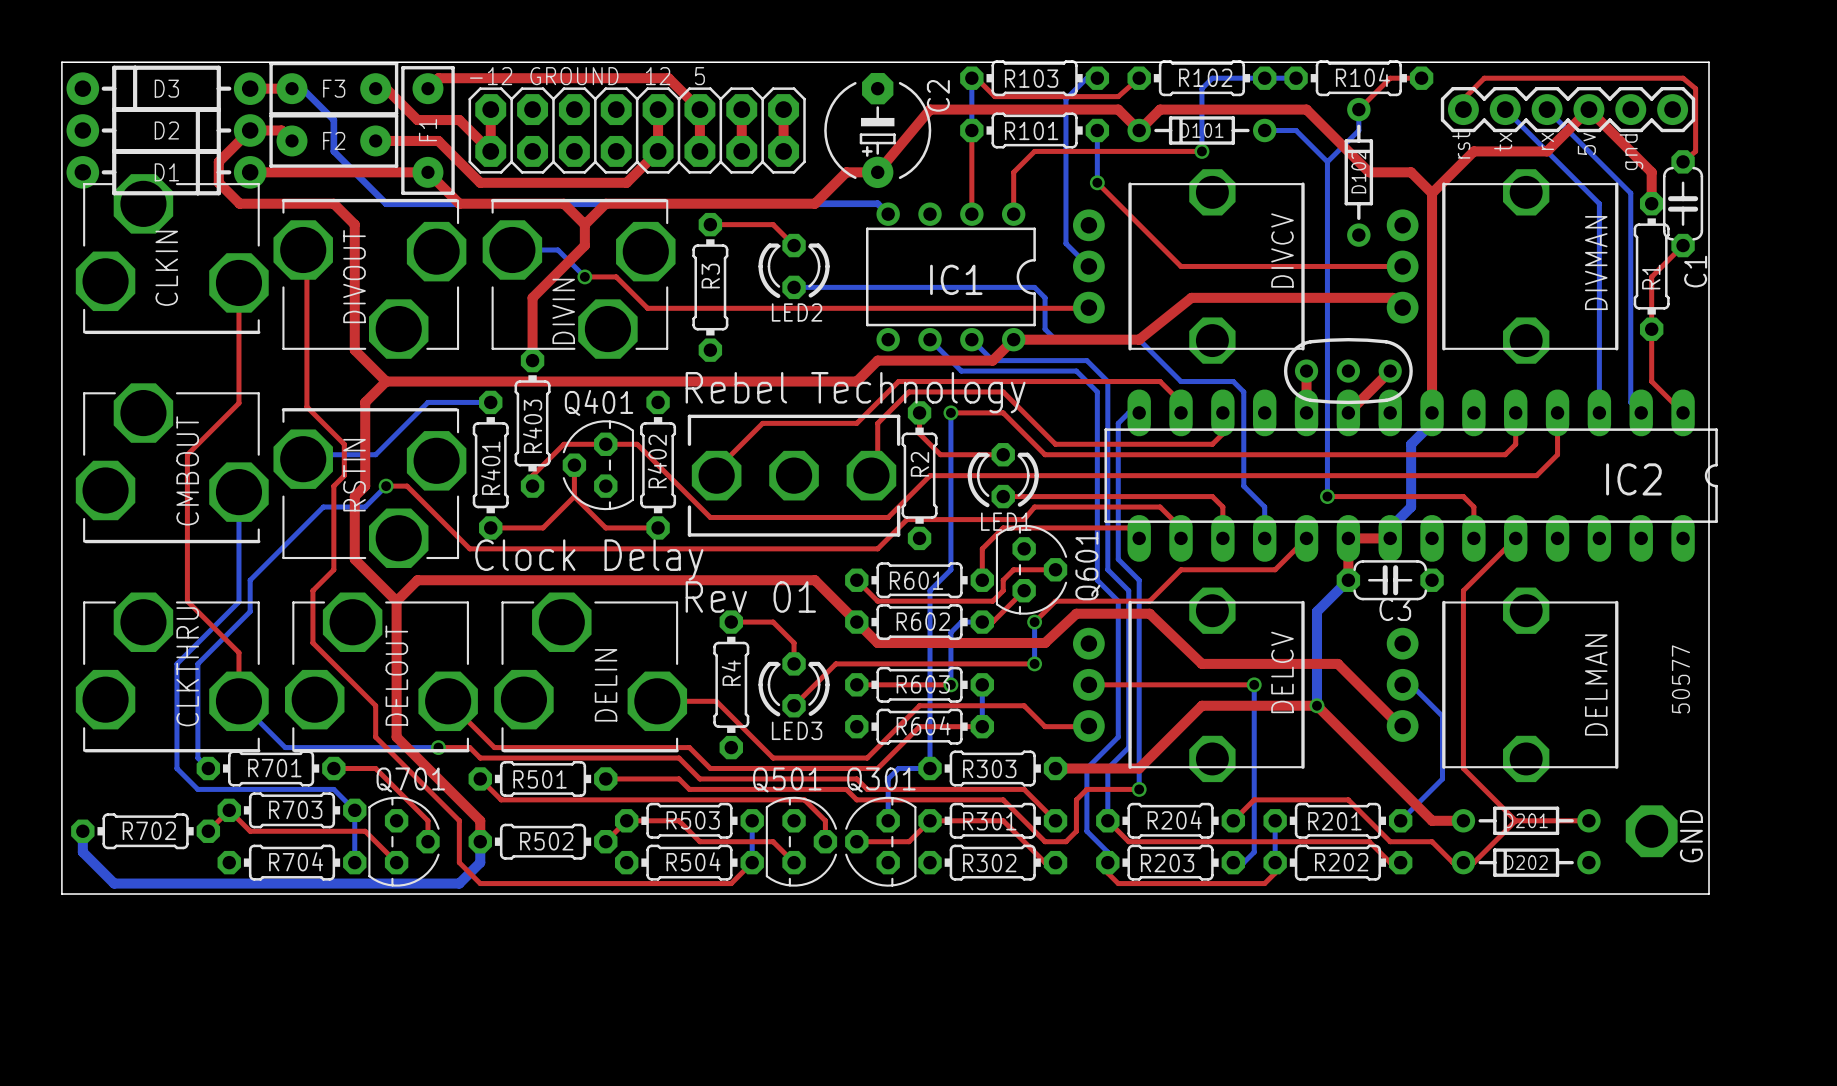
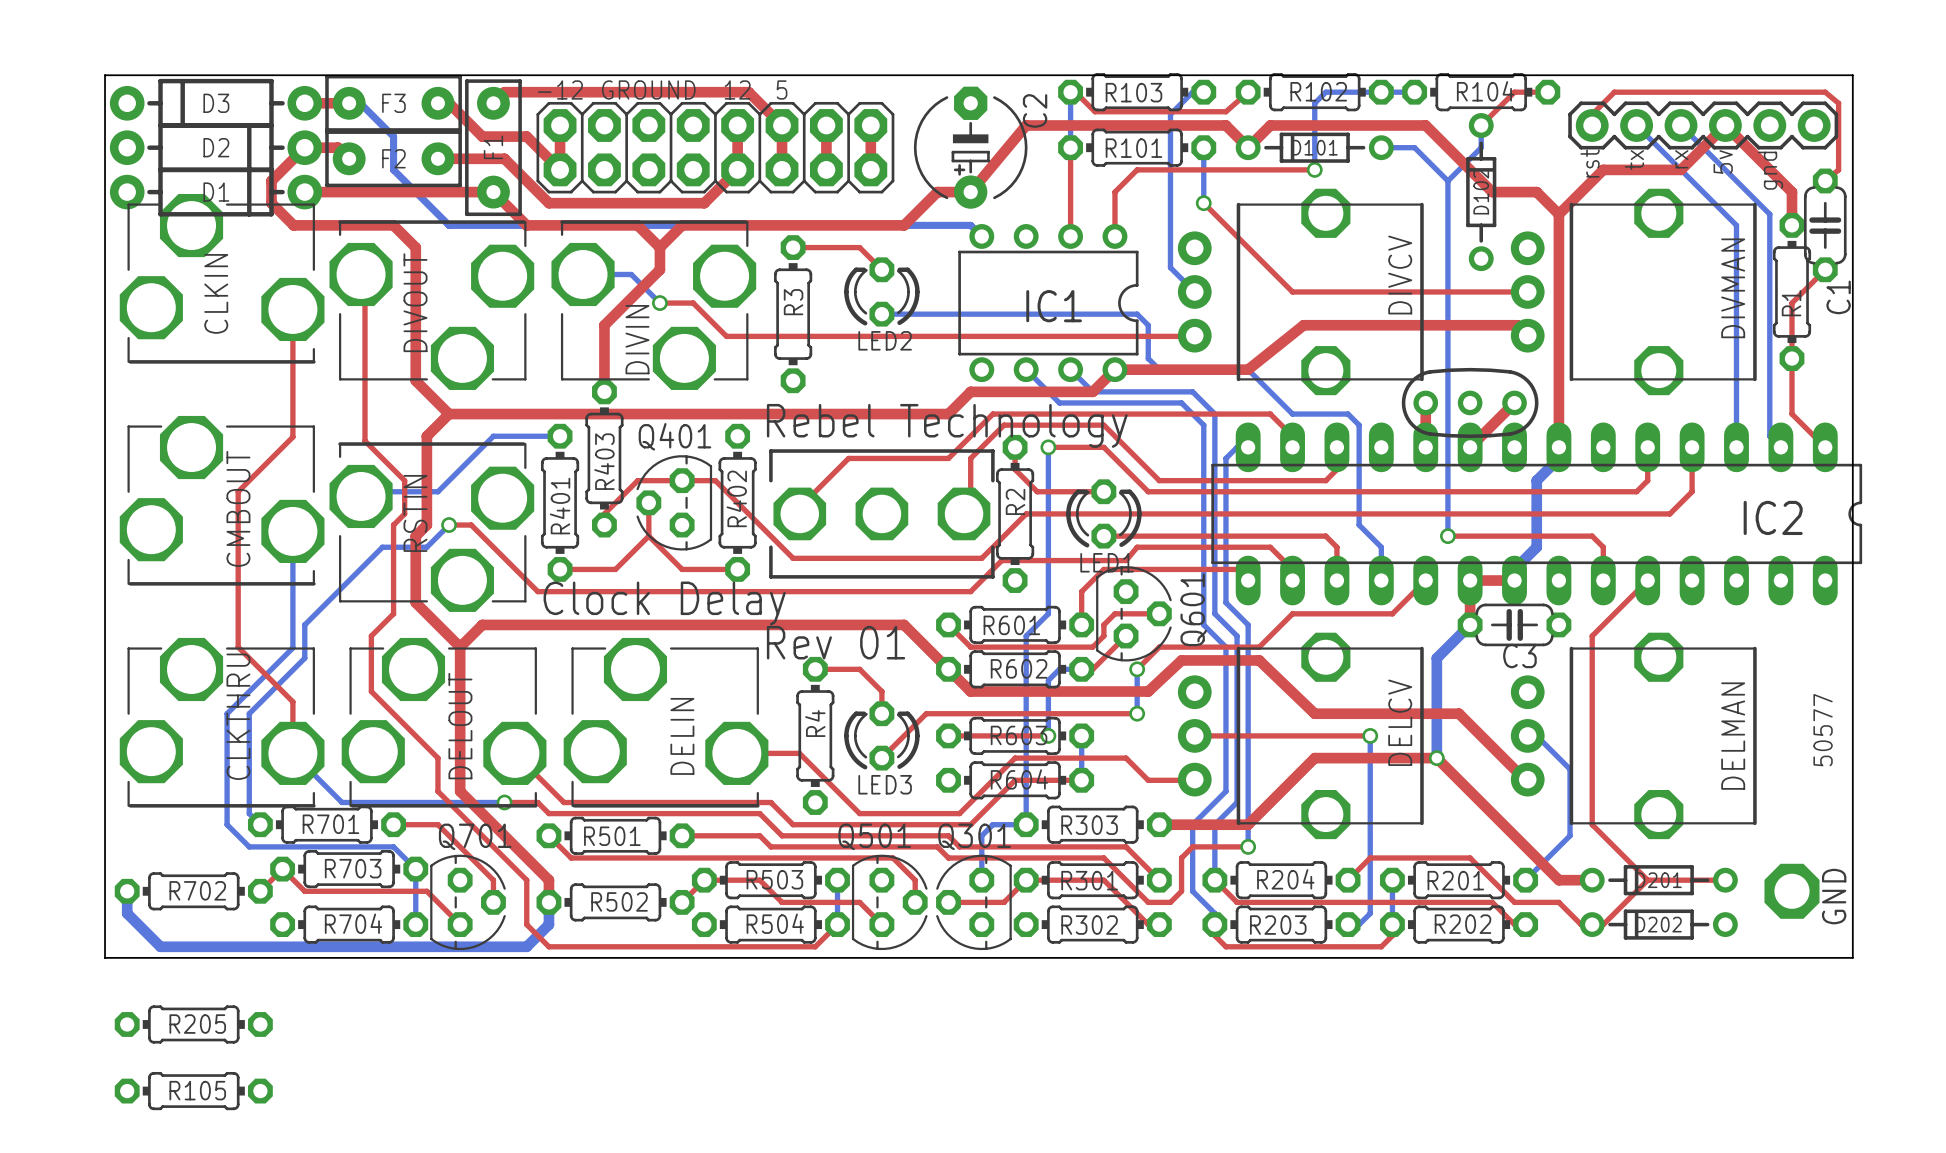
R205: none -> (193, 1024)
R105: none -> (193, 1091)

